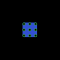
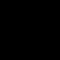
part: (29, 29) -> none

